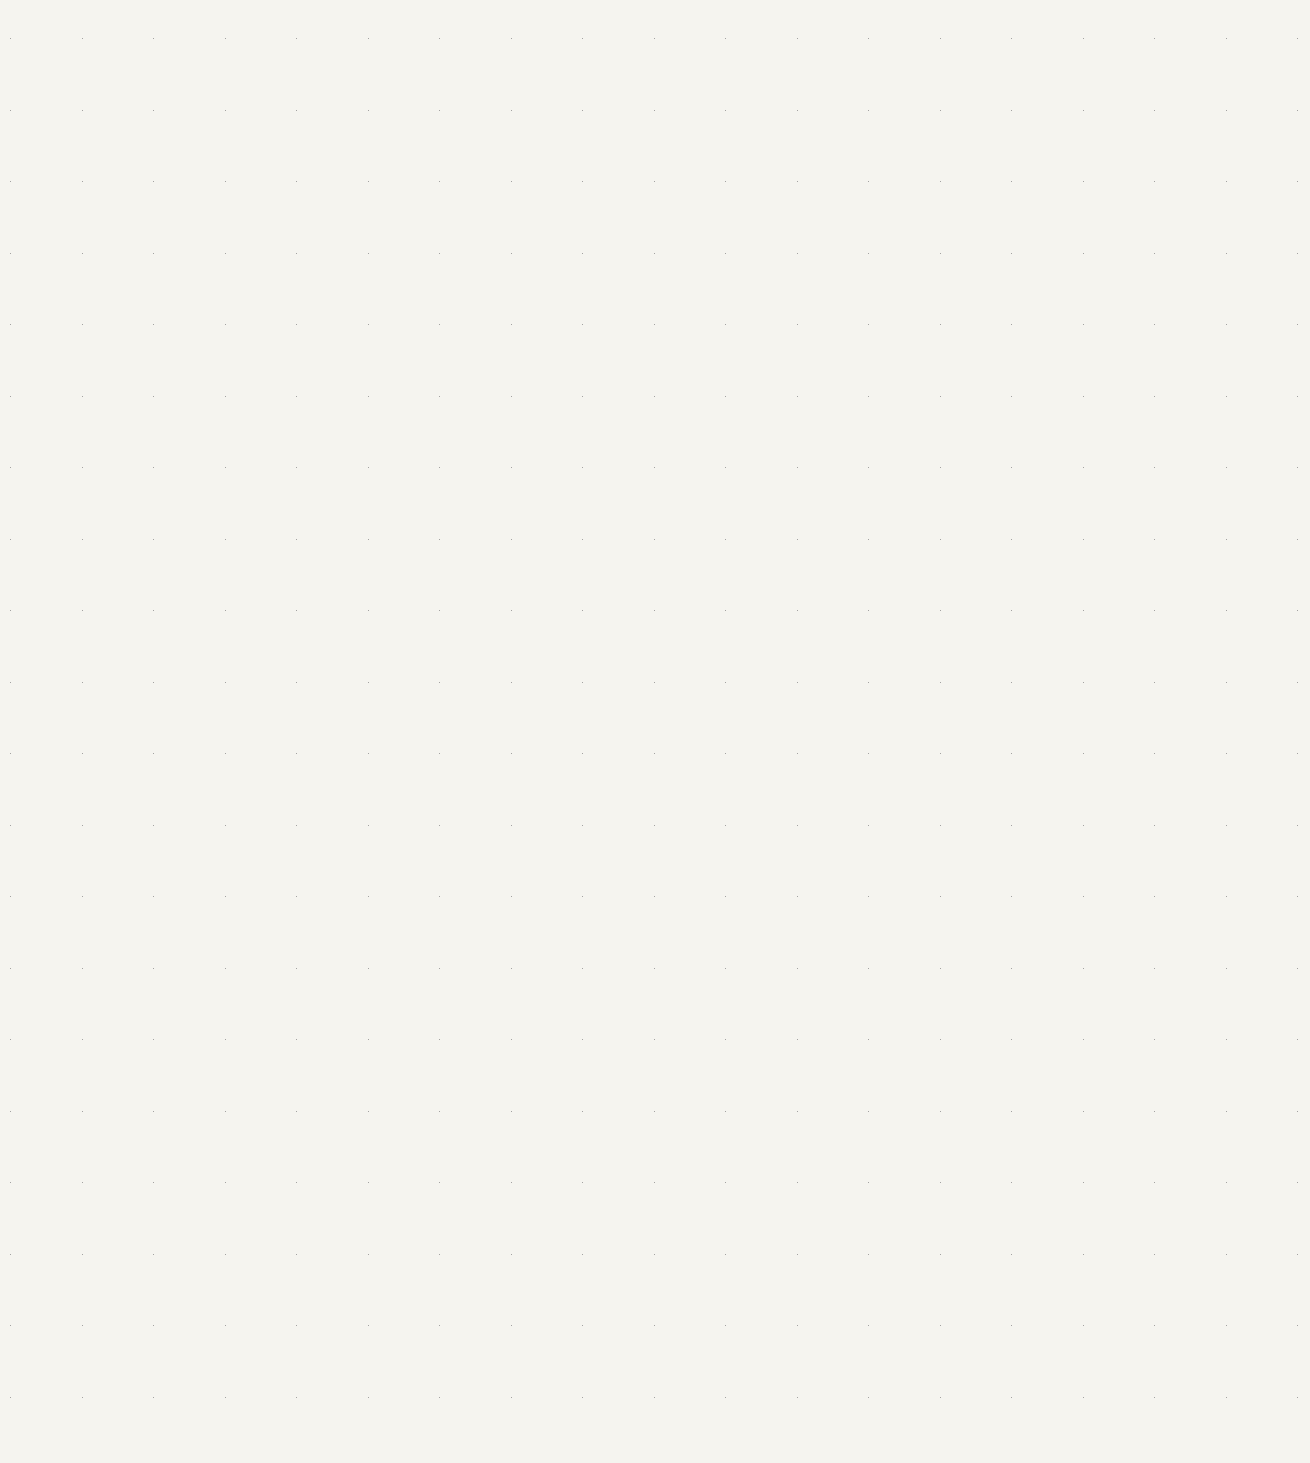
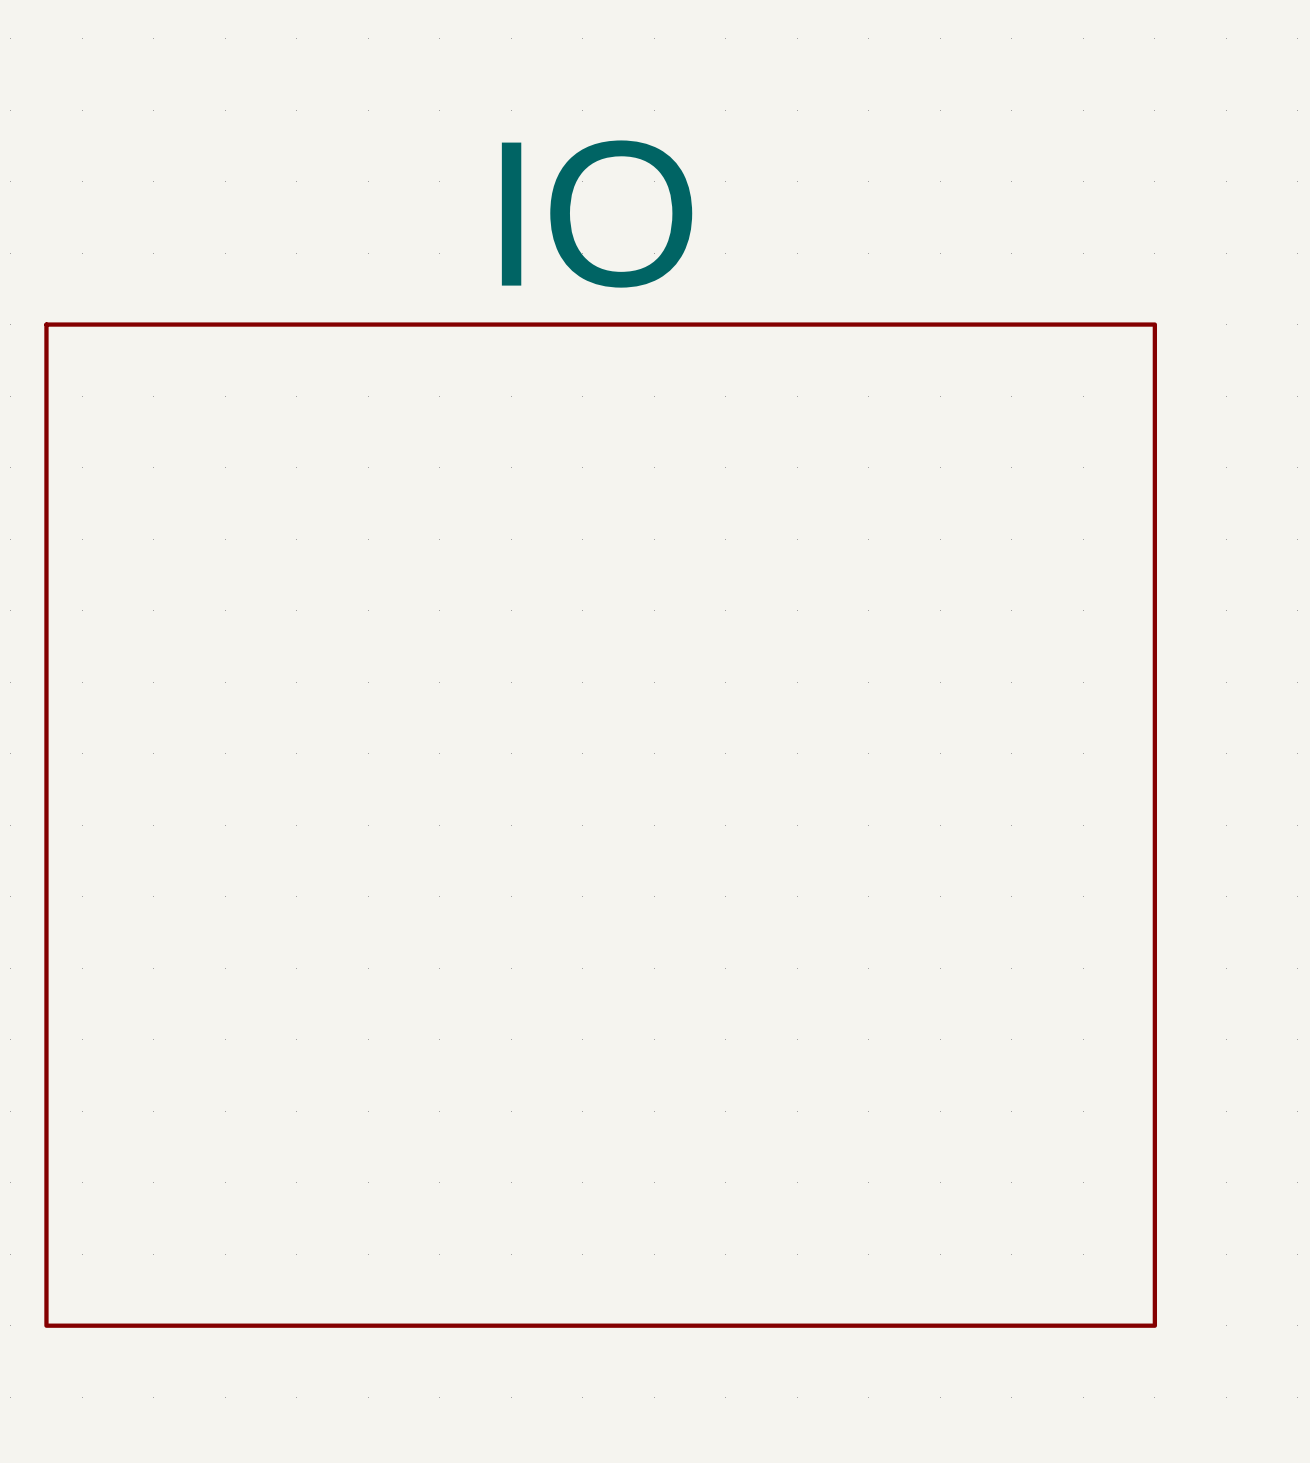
sheet IO: none -> (600, 825)

